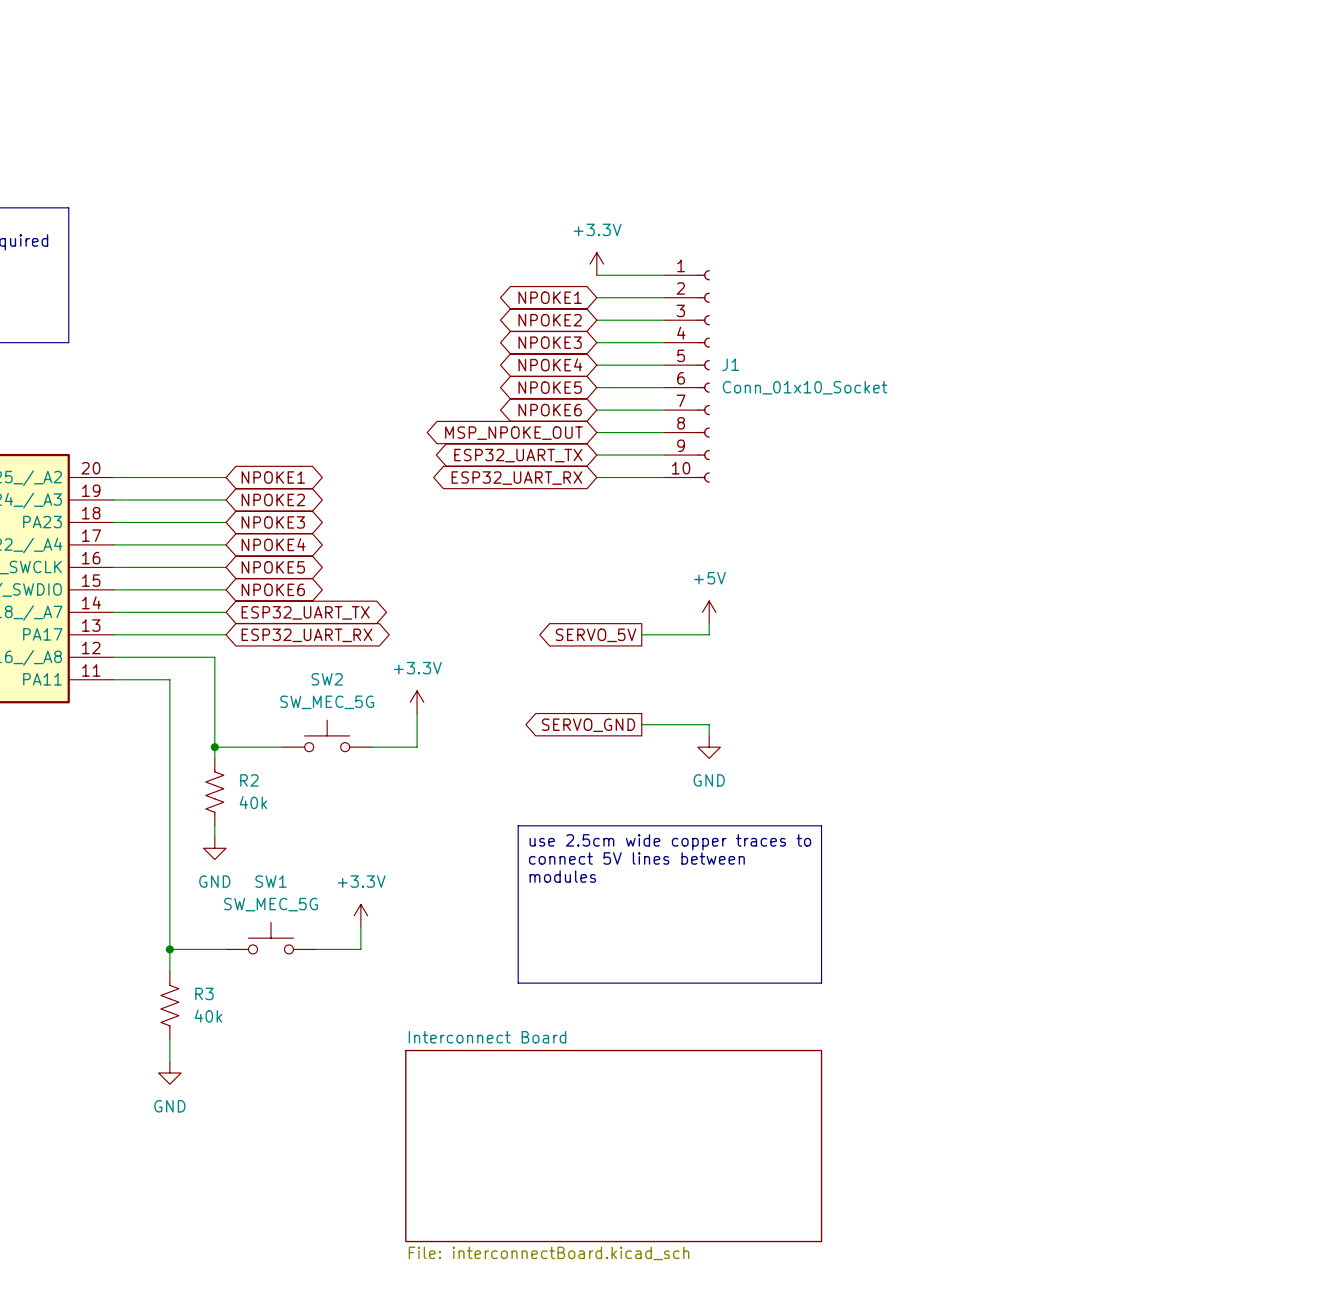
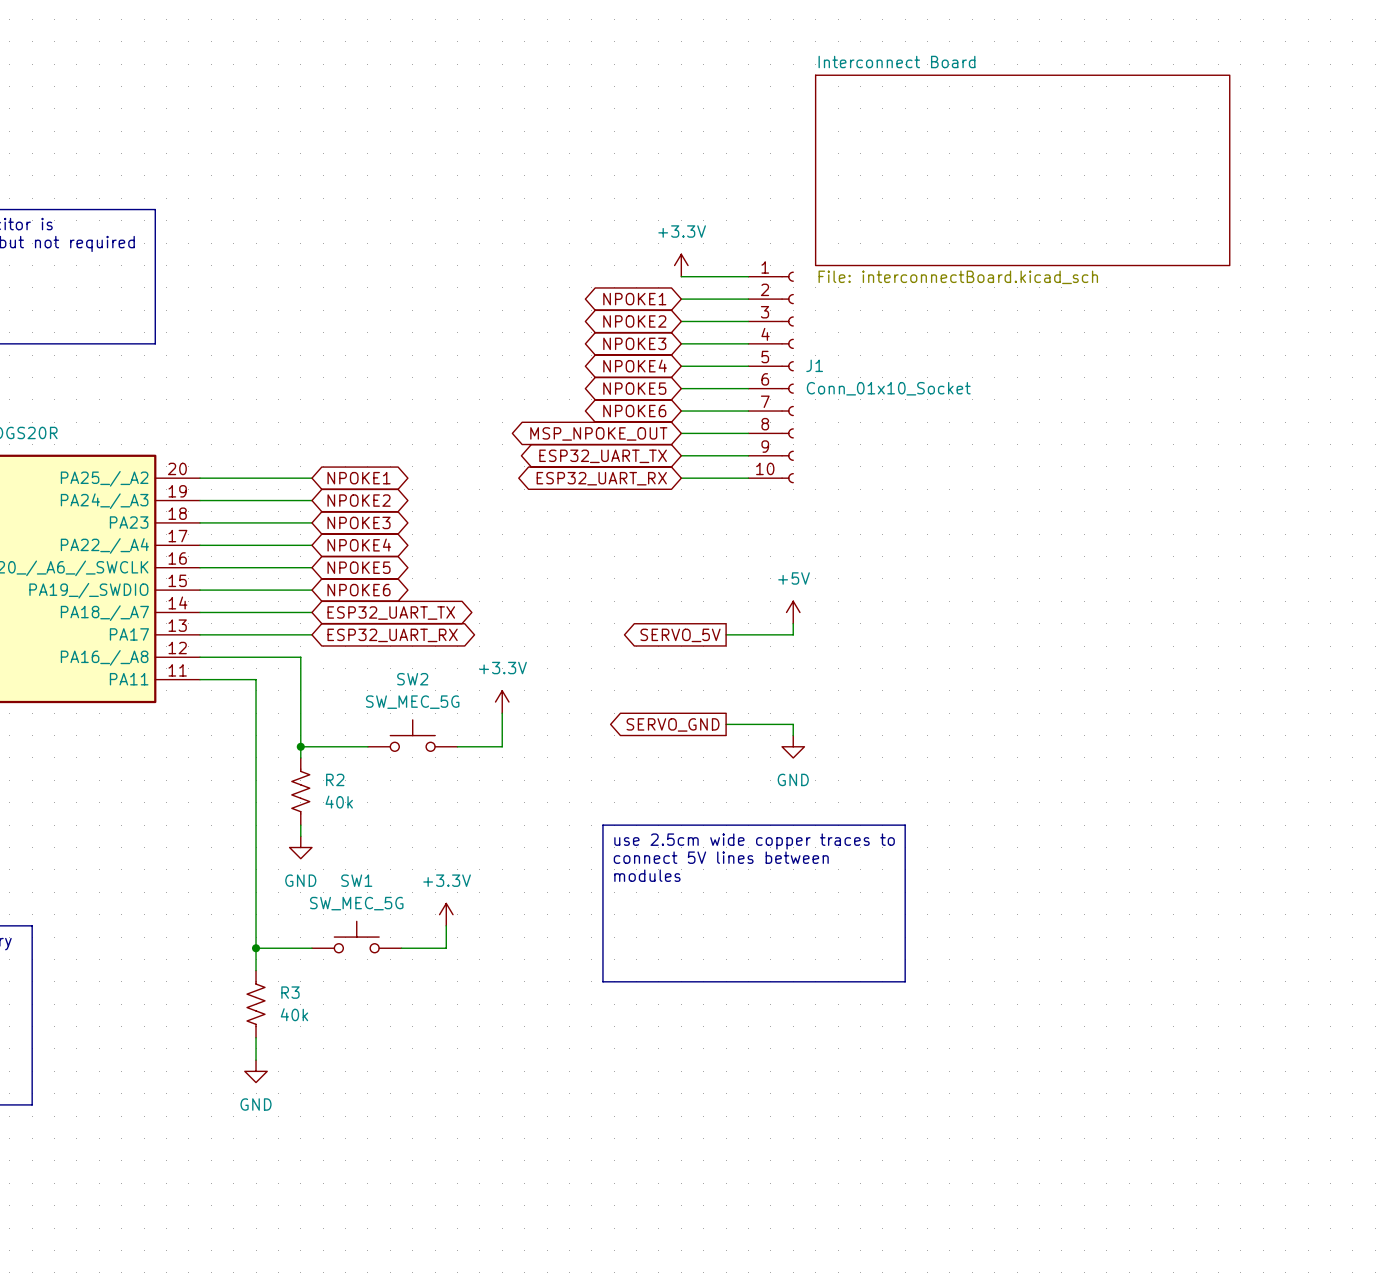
sheet Interconnect Board: none -> File: interconnectBoard.kicad_sch (1022, 170)
sheet Interconnect Board: File: interconnectBoard.kicad_sch (613, 1146) -> none

